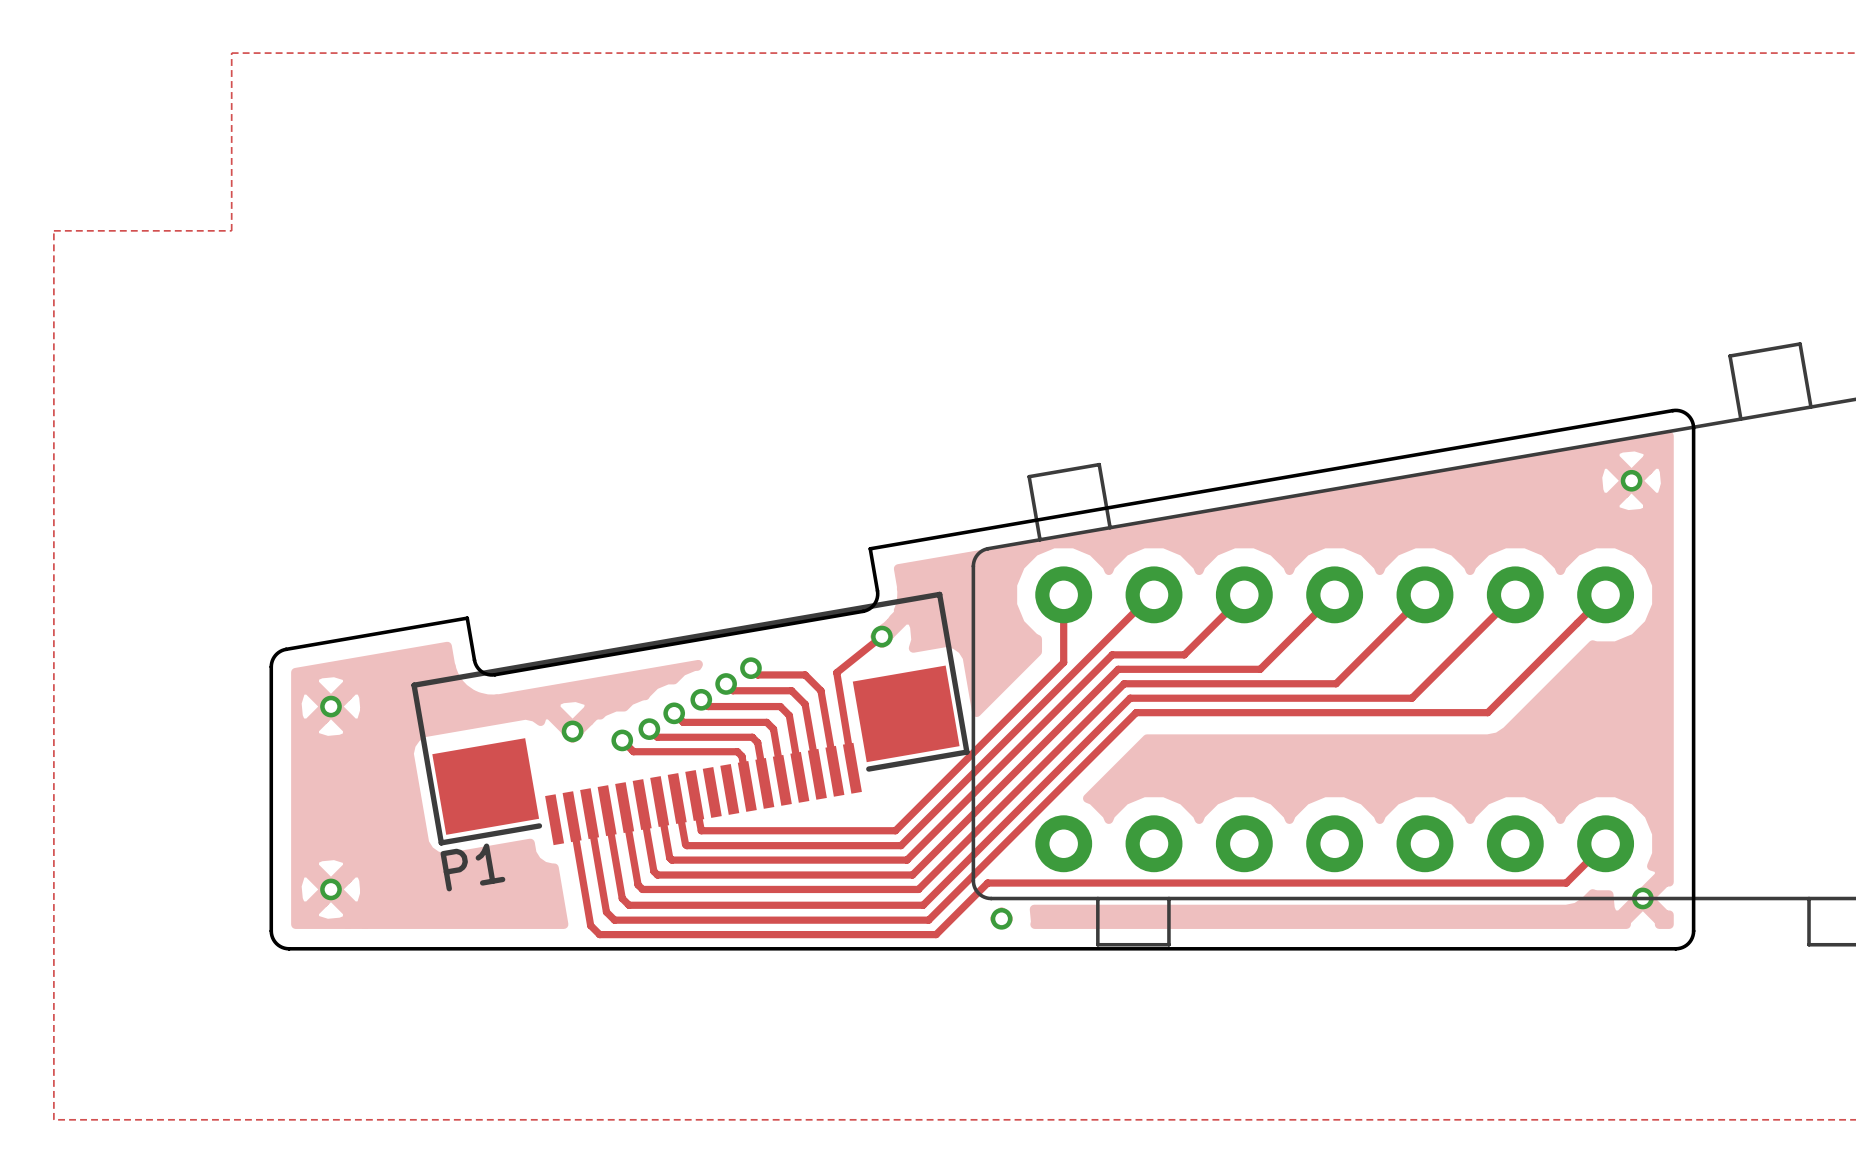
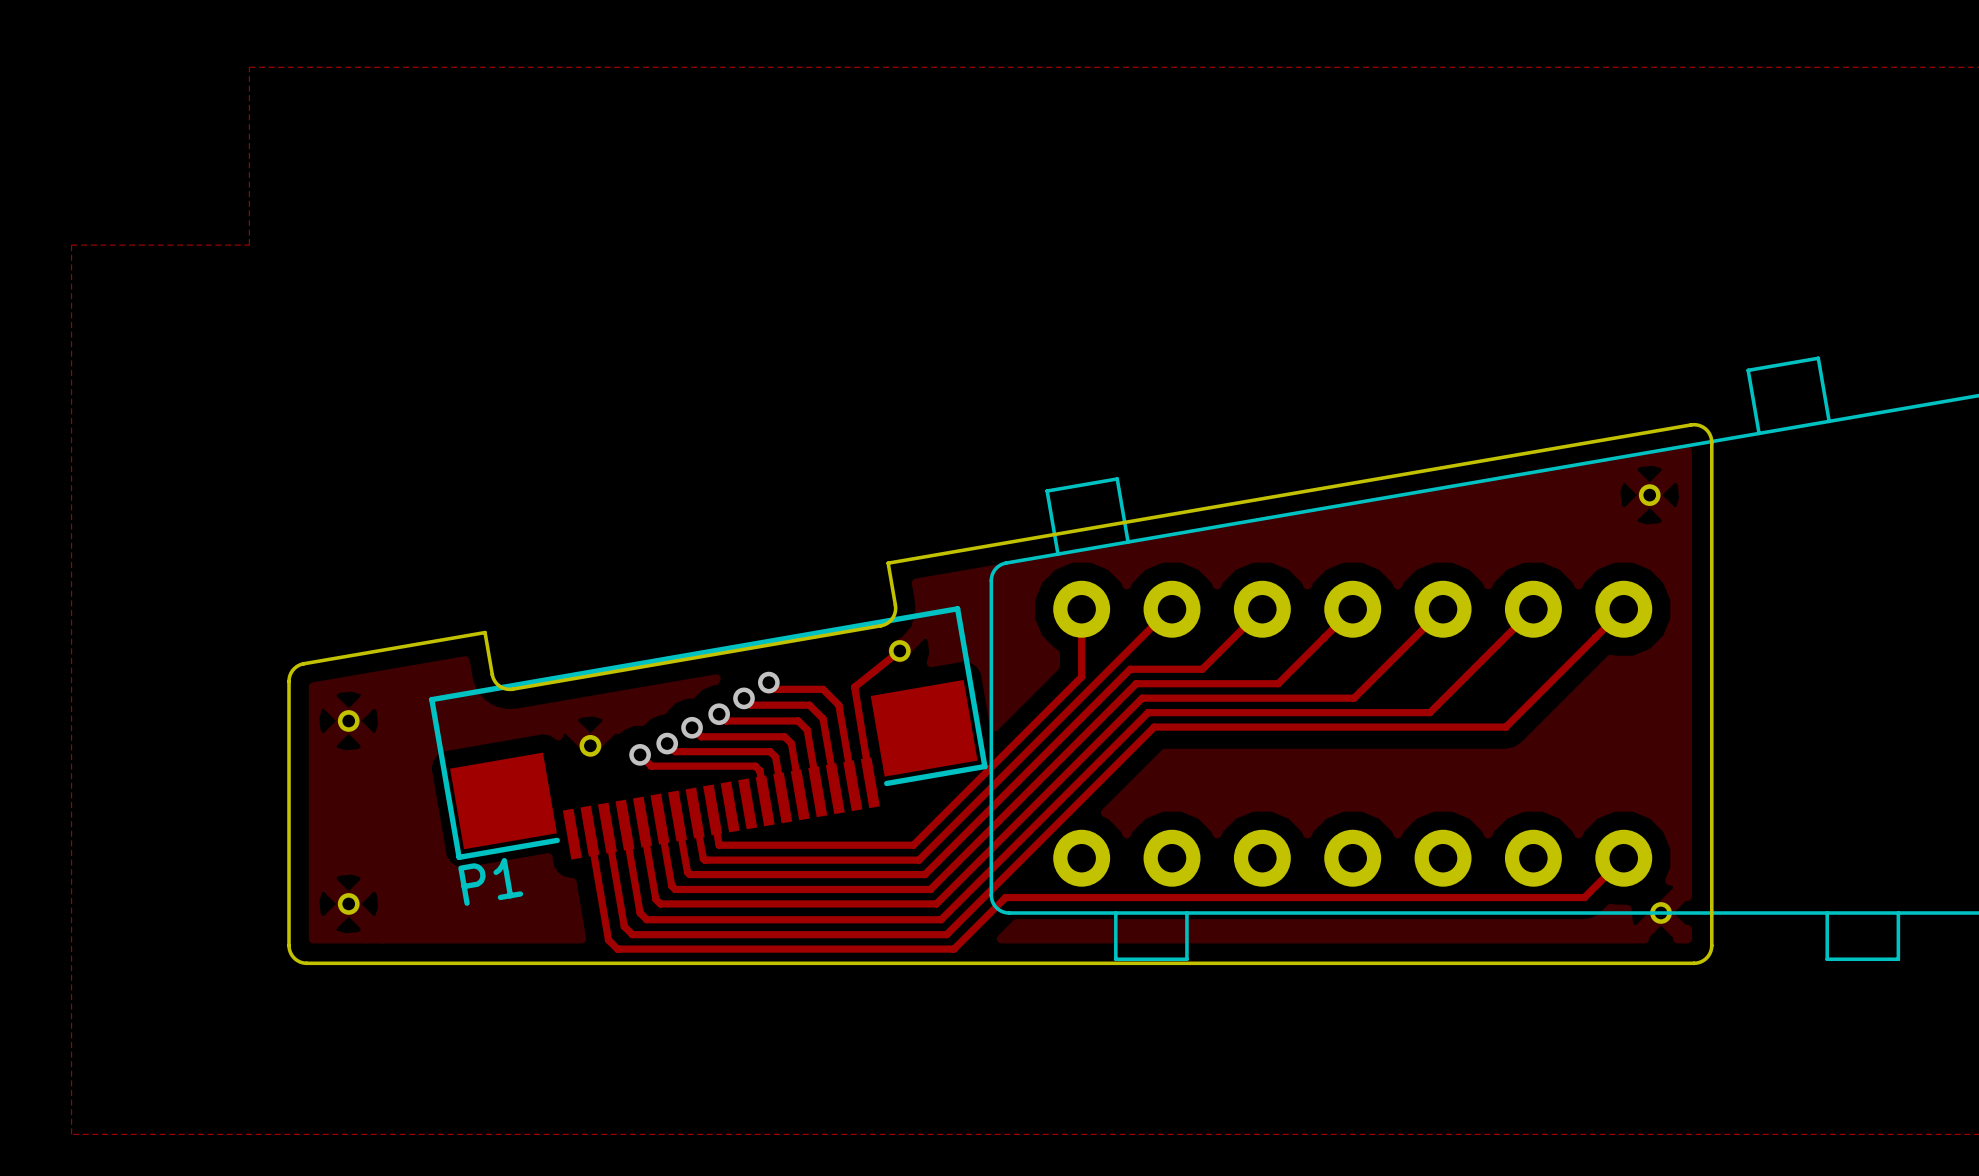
part: (1001, 918) -> none

